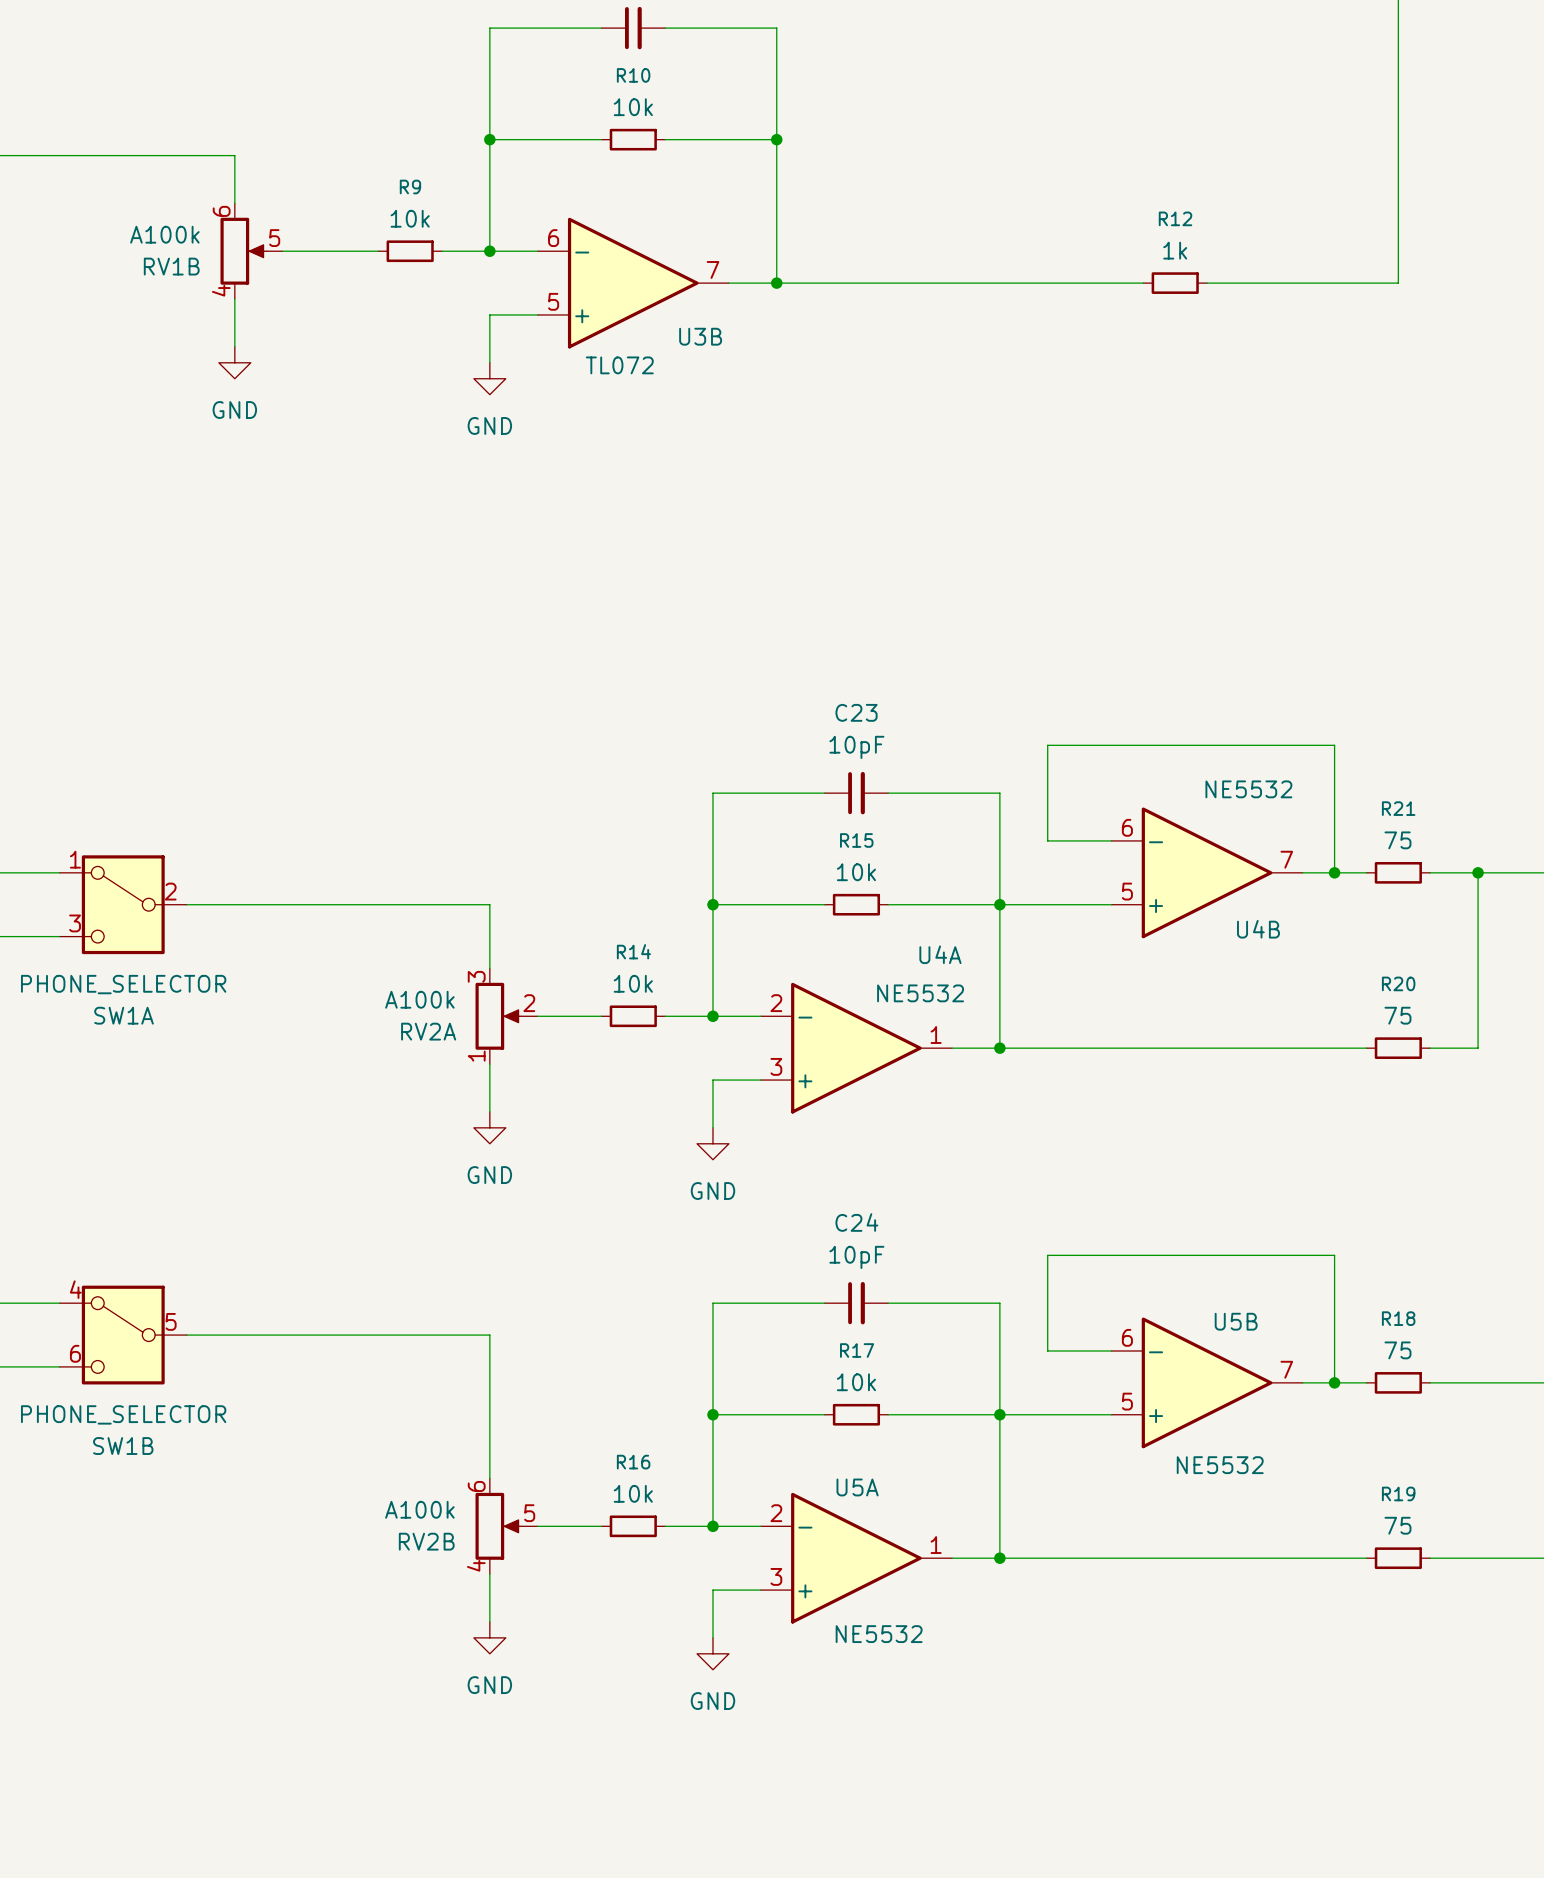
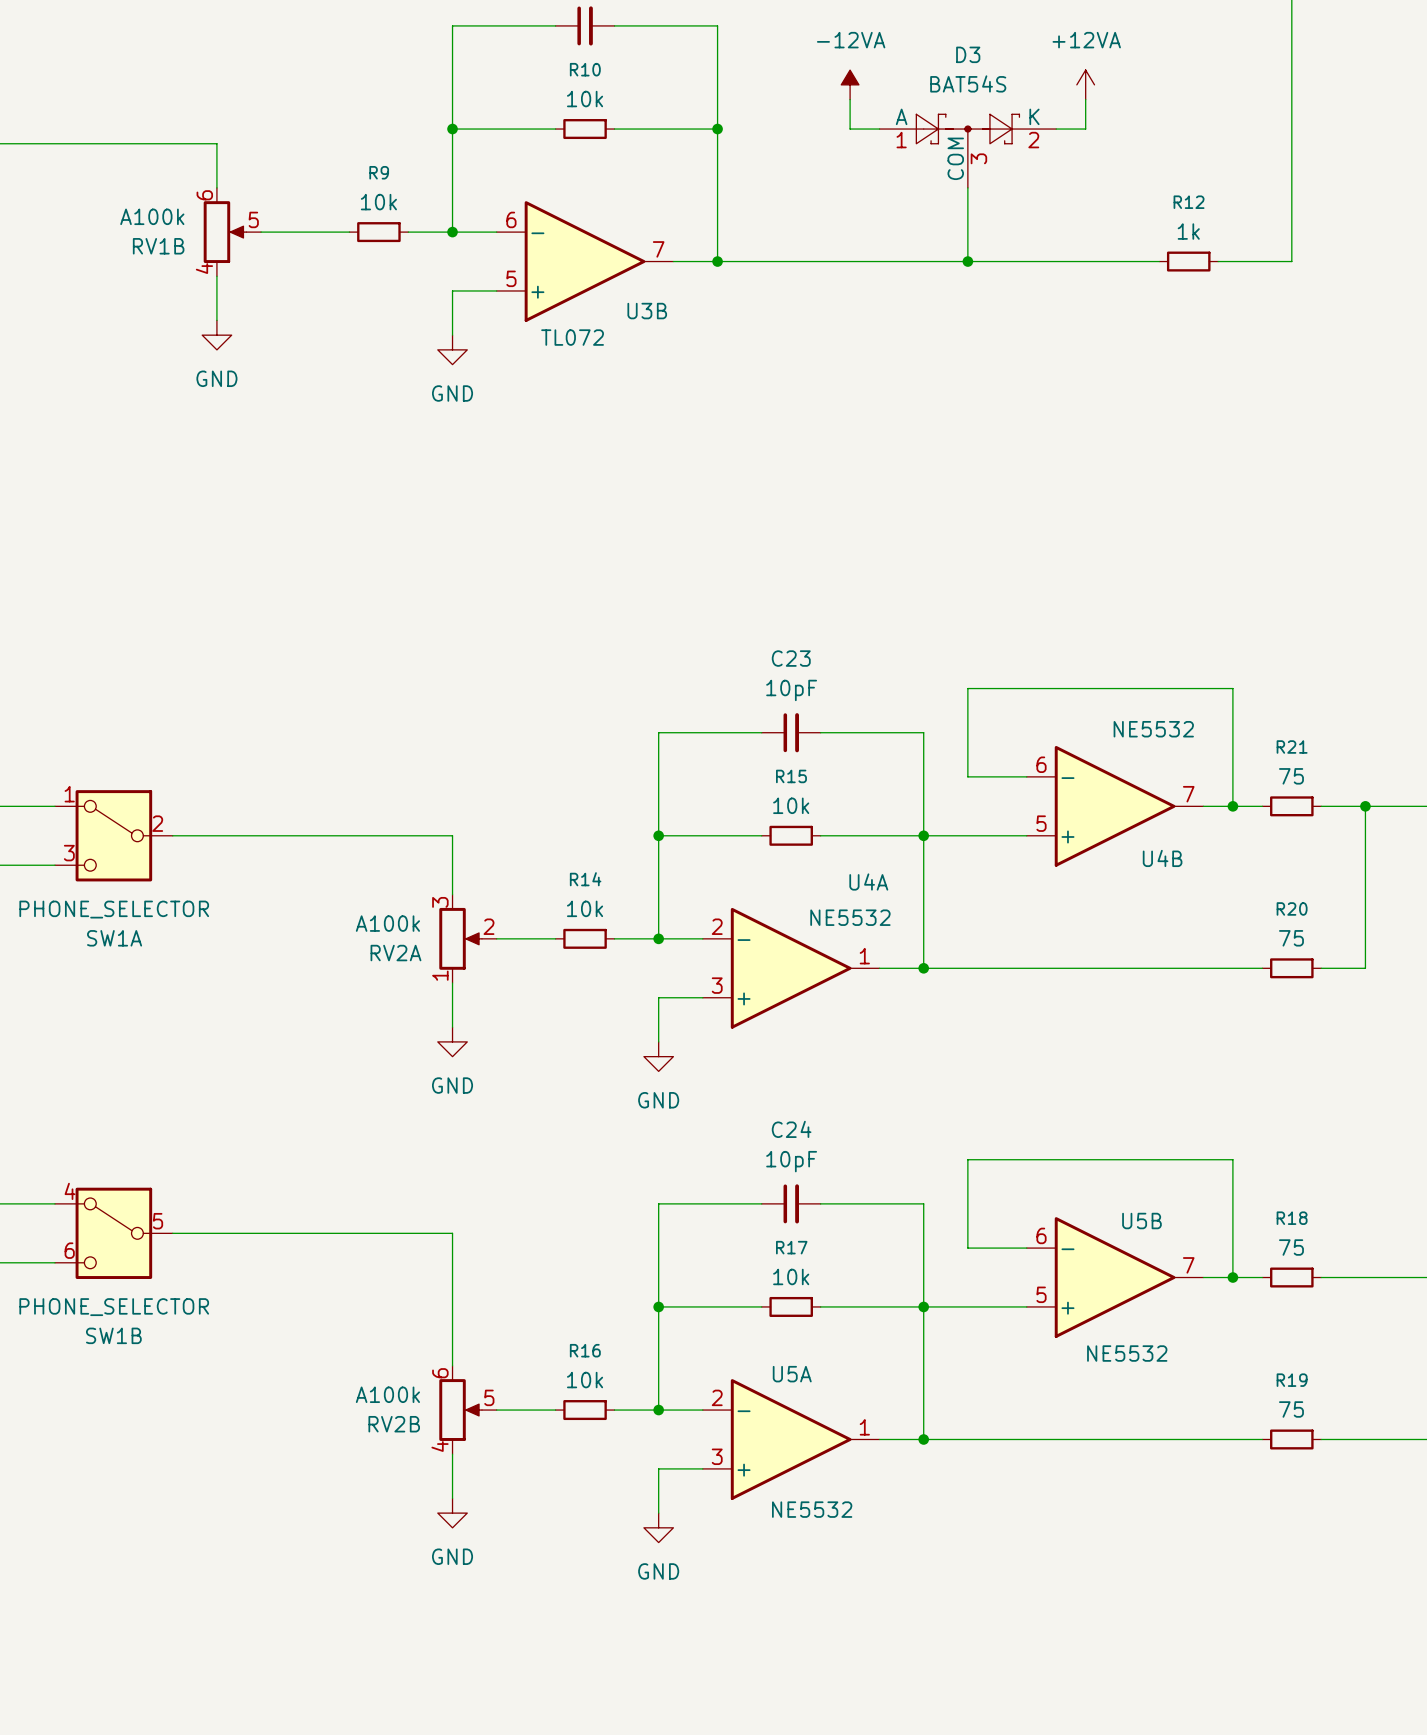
power symbol: none -> -12VA (850, 84)
power symbol: none -> +12VA (1085, 84)
wire: none -> (850, 99) (850, 129) (879, 129)
wire: none -> (1085, 99) (1085, 129) (1056, 129)
D3: none -> BAT54S (967, 151)
wire: none -> (967, 187) (967, 261)
junction: none -> (967, 261)
R12 position: (1175, 283) -> (1188, 261)
wire: (1254, 283) (1318, 283) -> (1056, 261) (1115, 261)

